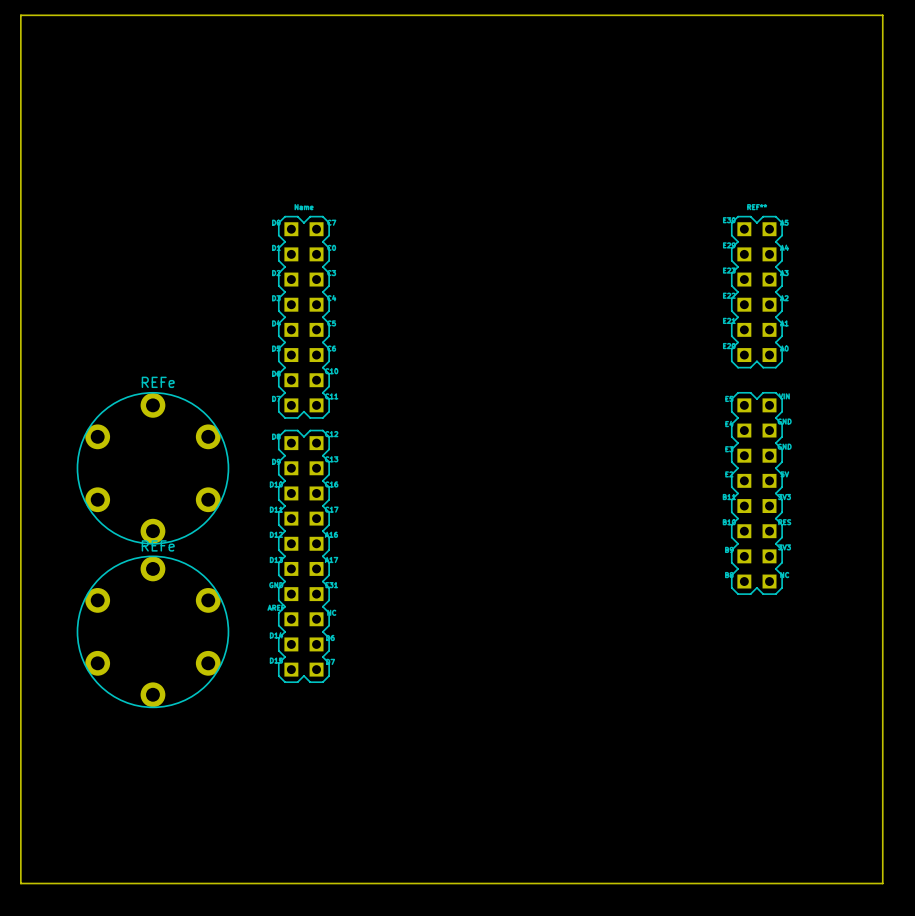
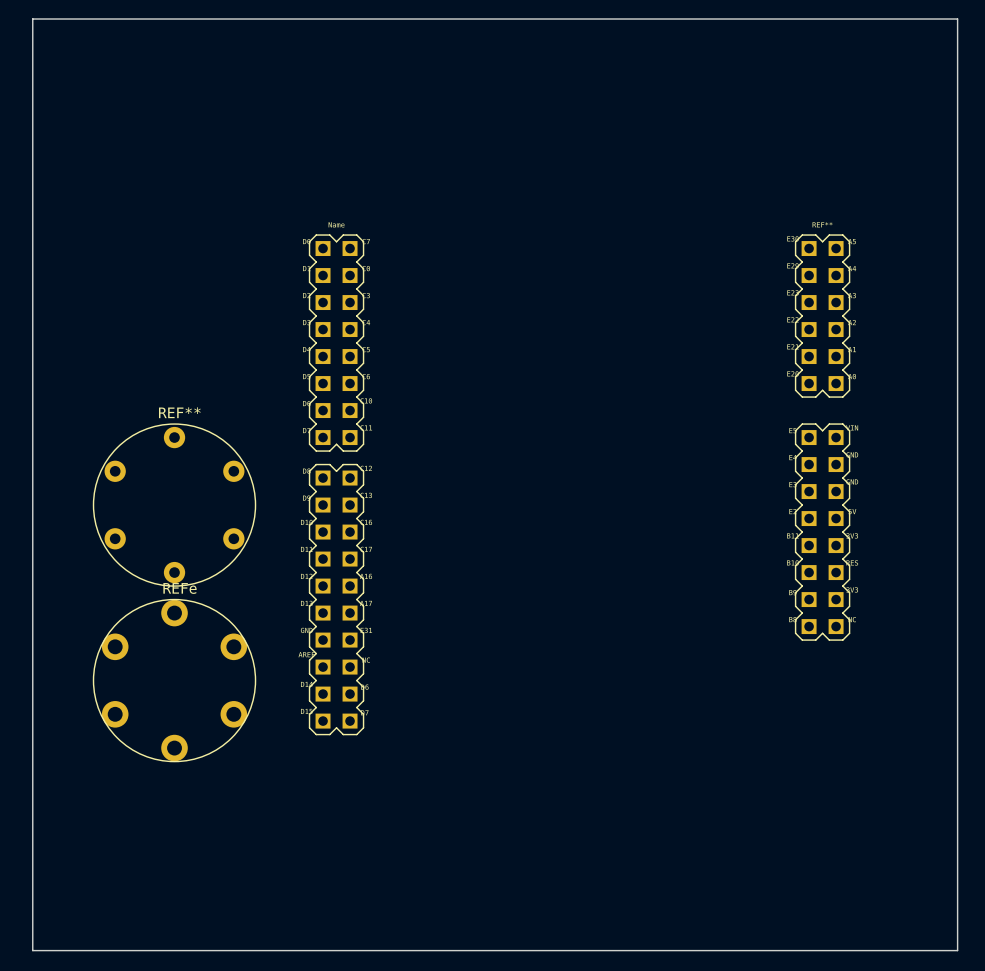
REFe: (152, 468) -> none
REF**: none -> (174, 505)

